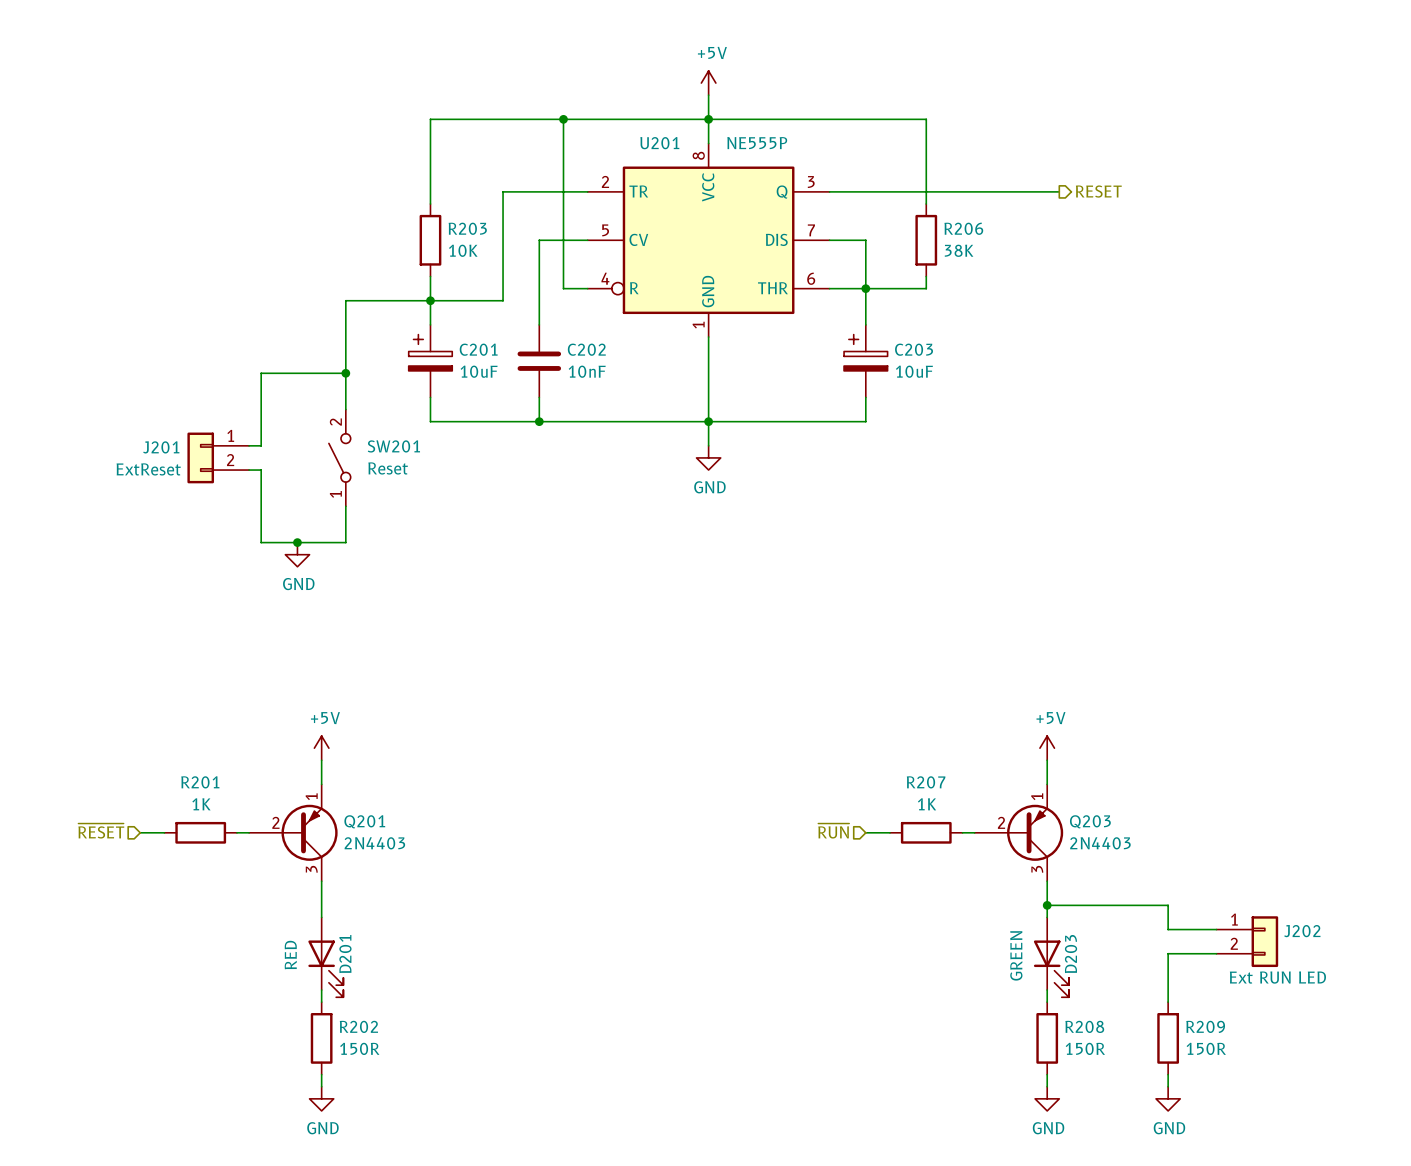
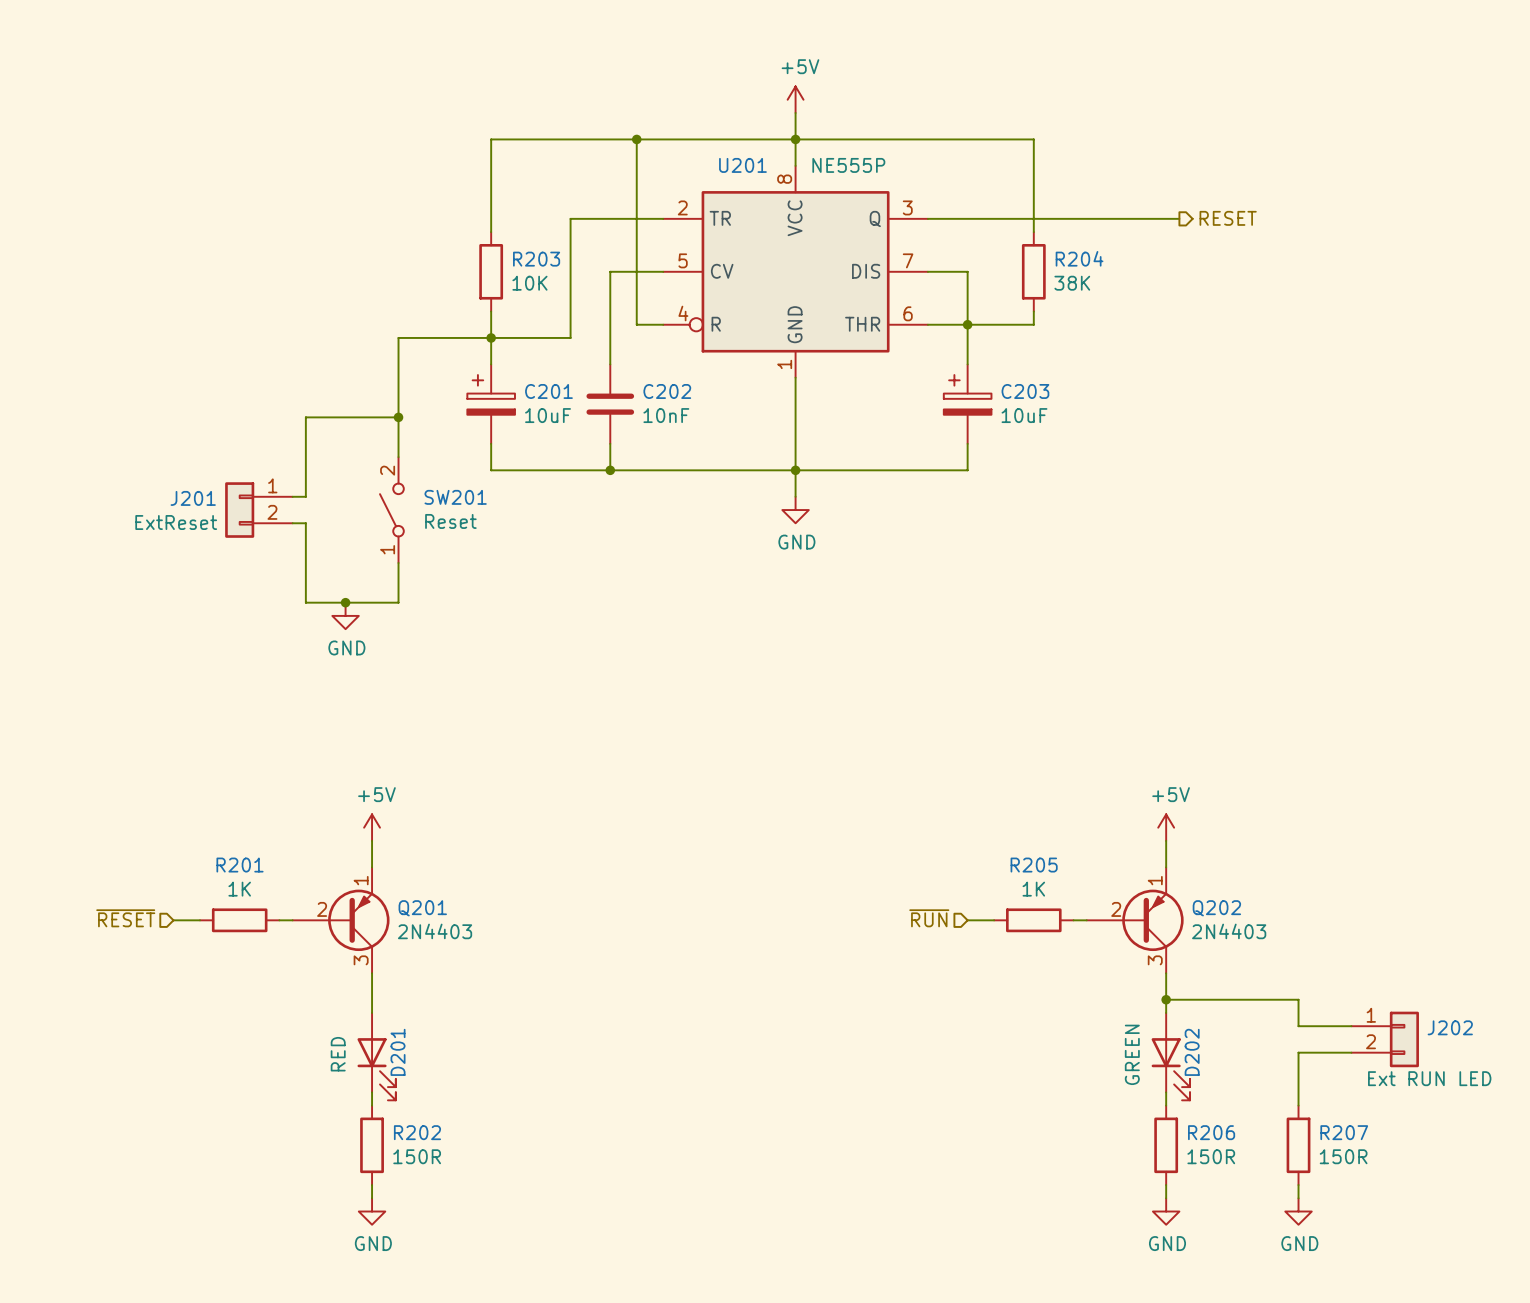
R206 name: R206 (963, 228) -> R204 (1079, 258)
R207 name: R207 (926, 782) -> R205 (1034, 865)
Q203 name: Q203 (1090, 821) -> Q202 (1216, 908)
D203 name: D203 (1071, 954) -> D202 (1192, 1052)
R208 name: R208 (1084, 1026) -> R206 (1211, 1132)
R209 name: R209 (1205, 1026) -> R207 (1344, 1132)

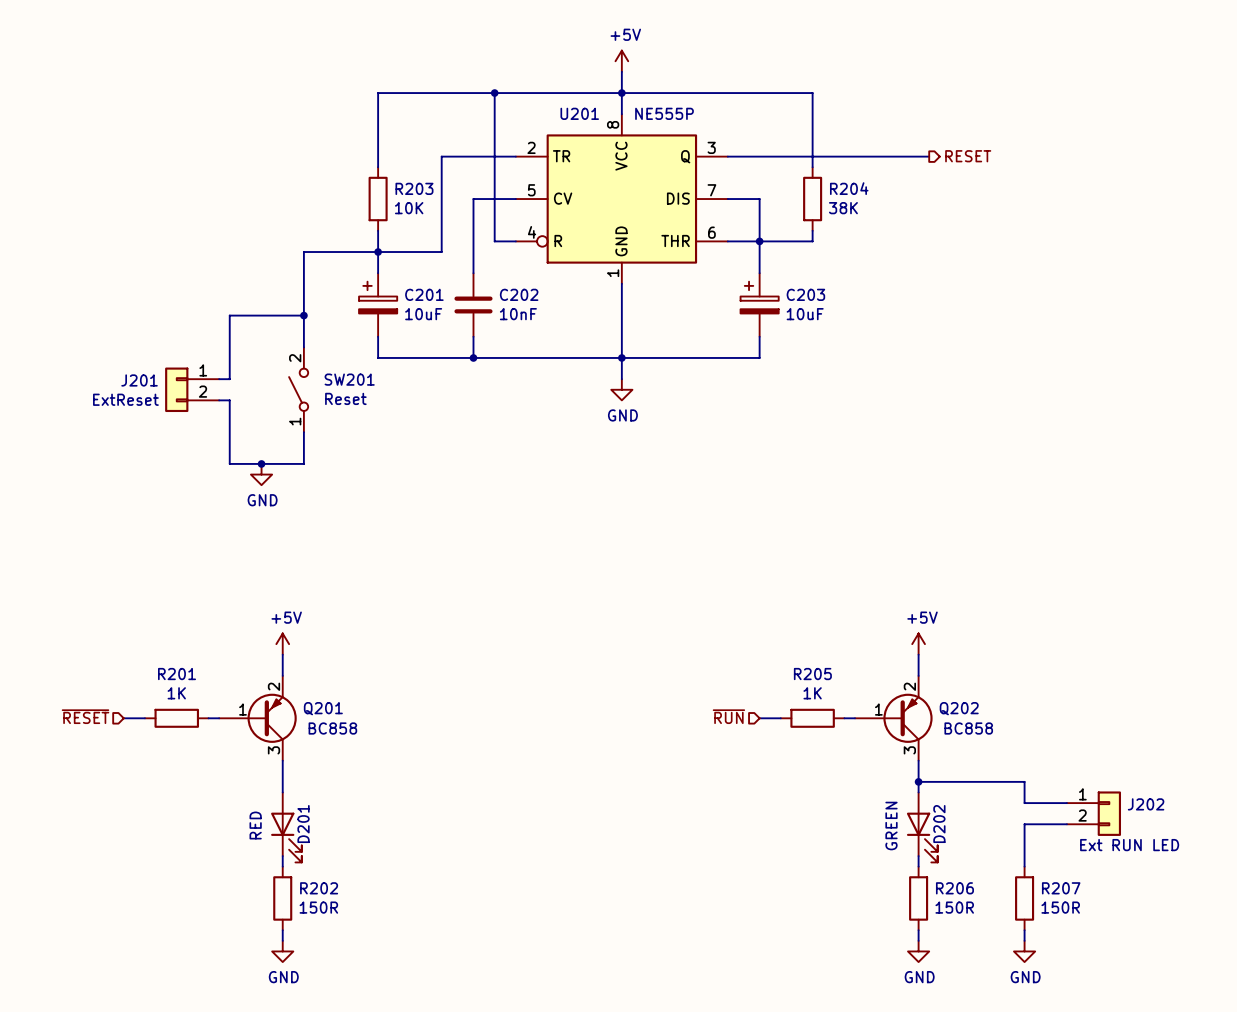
Q201 pin number: 1 (361, 880) -> 2 (273, 686)
Q202 pin number: 1 (1155, 880) -> 2 (909, 686)
Q201 pin number: 2 (322, 909) -> 1 (242, 709)
Q202 pin number: 2 (1116, 909) -> 1 (878, 709)
Q201 value: 2N4403 (435, 931) -> BC858 (332, 728)
Q202 value: 2N4403 (1229, 931) -> BC858 (968, 728)

